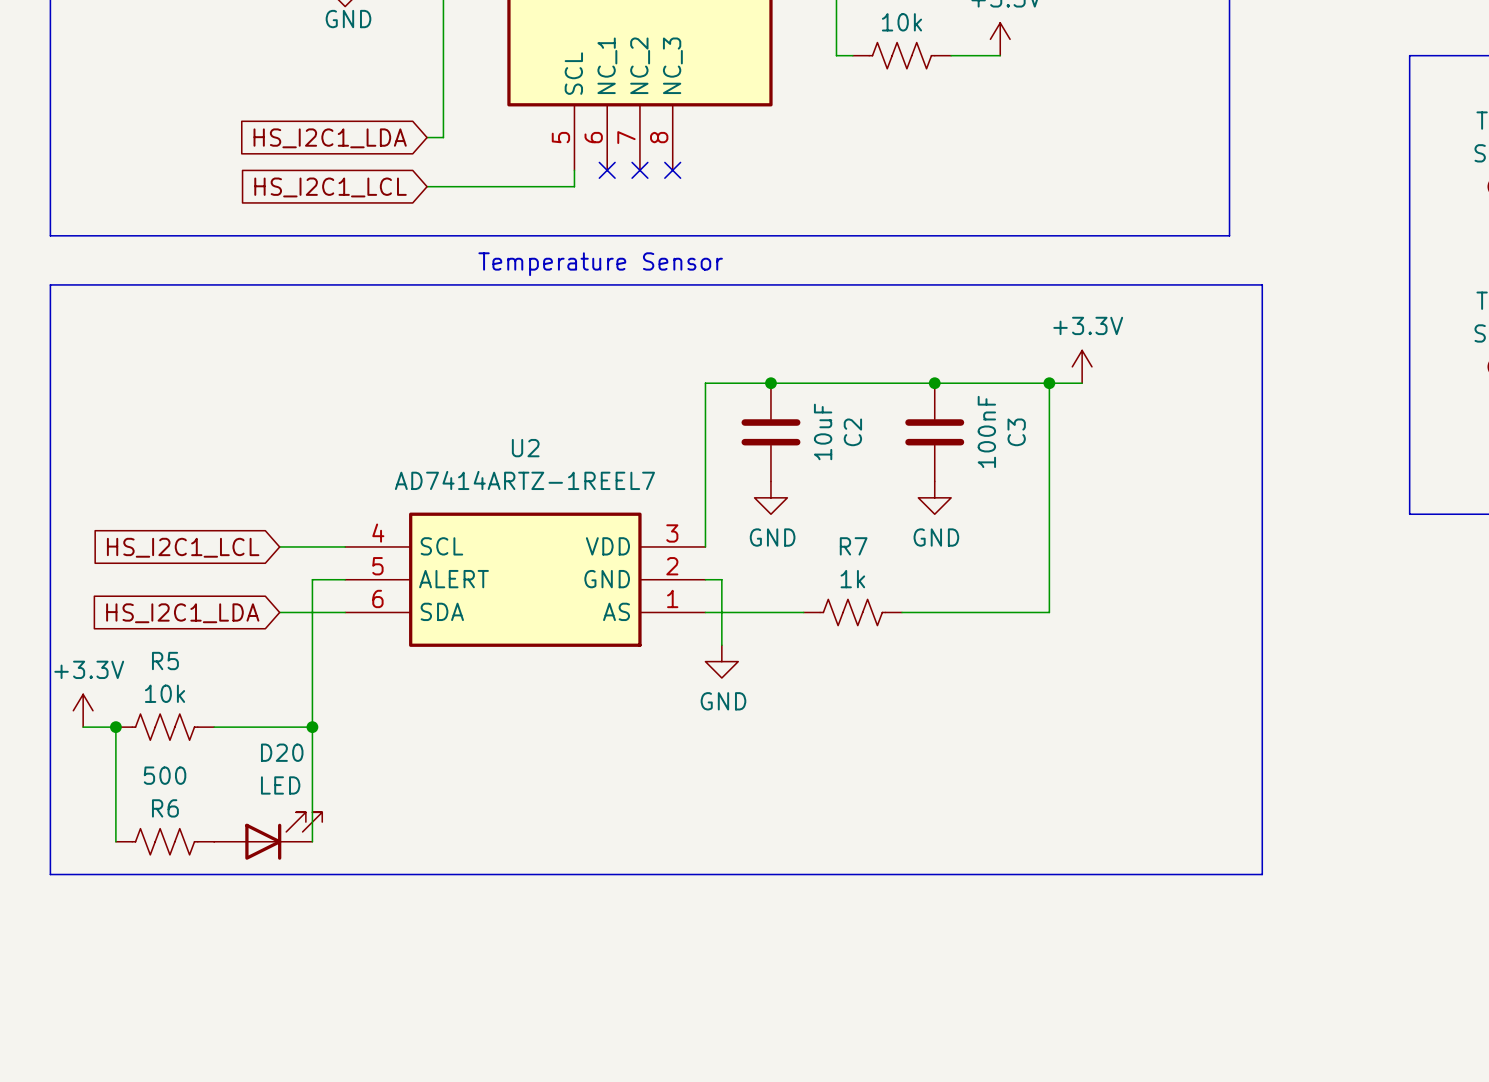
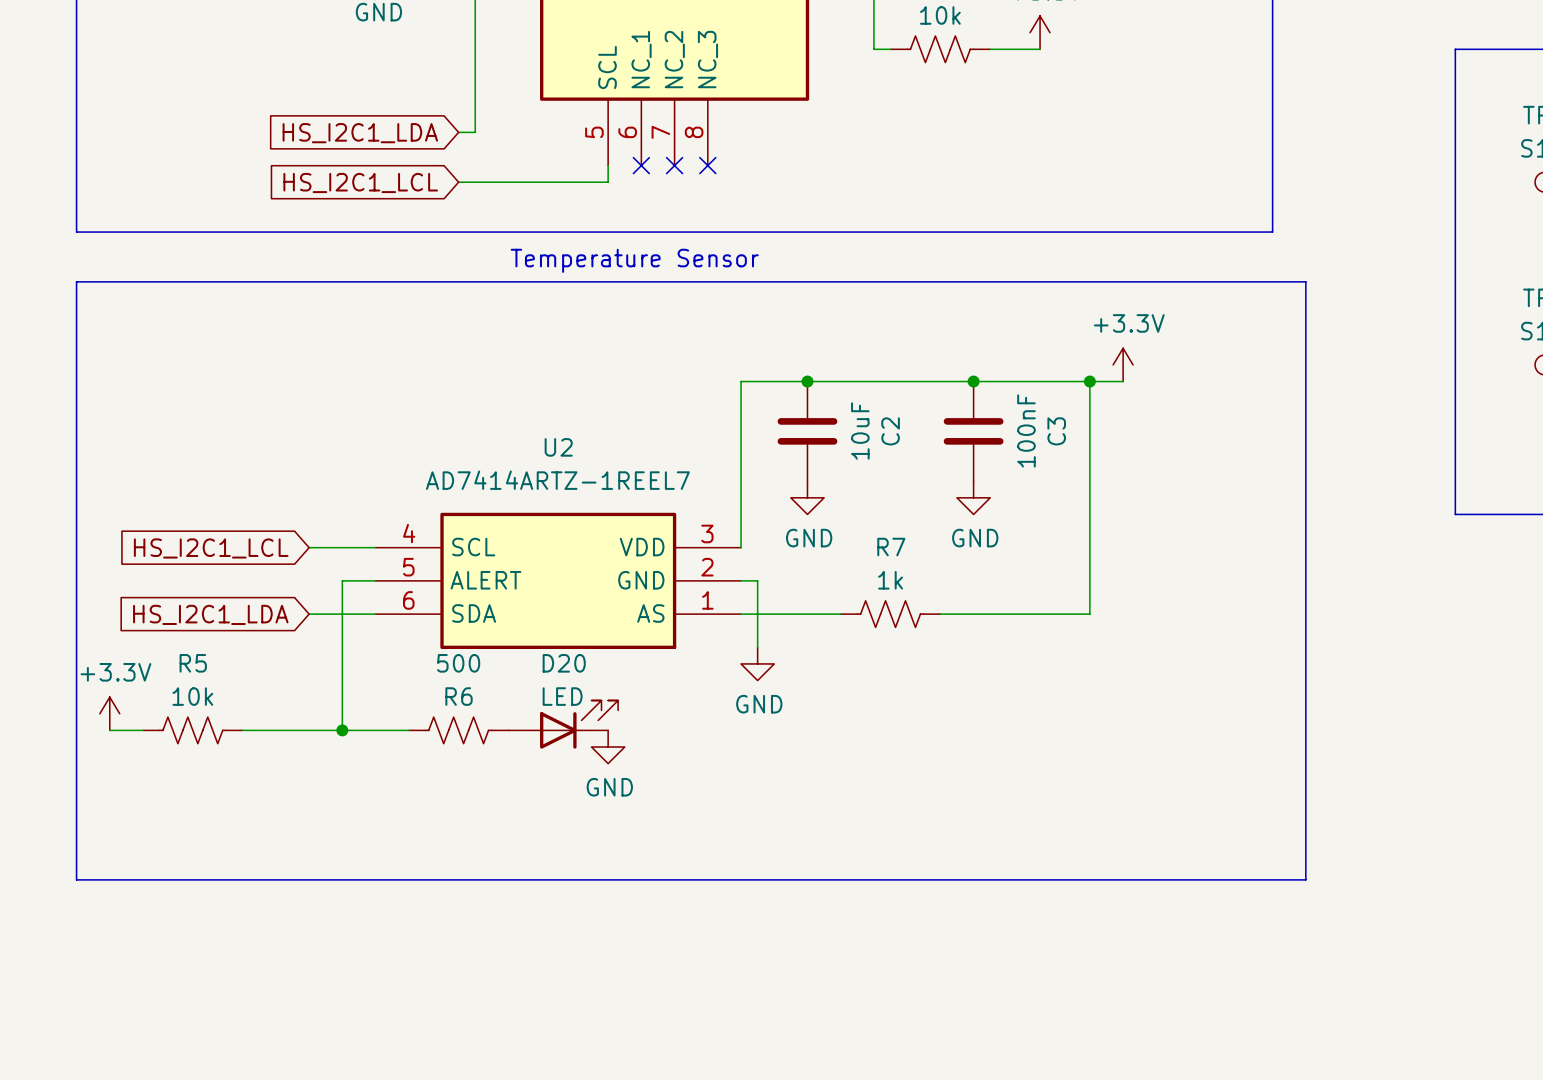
wire: (115, 727) (115, 841) -> none
junction: (115, 727) -> none
wire: (312, 727) (312, 841) -> (342, 730) (408, 730)
power symbol: none -> GND (608, 747)
D20 name position: D20 (282, 752) -> D20 (564, 663)
D20 value position: LED (280, 785) -> LED (562, 696)
D20 position: (268, 836) -> (563, 724)
R6 position: (165, 841) -> (458, 730)

